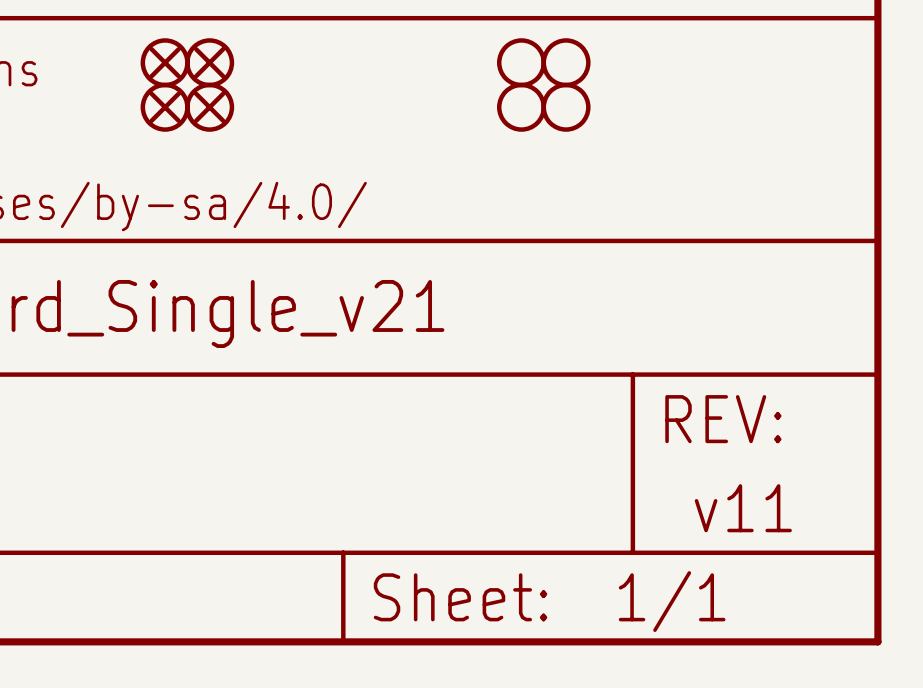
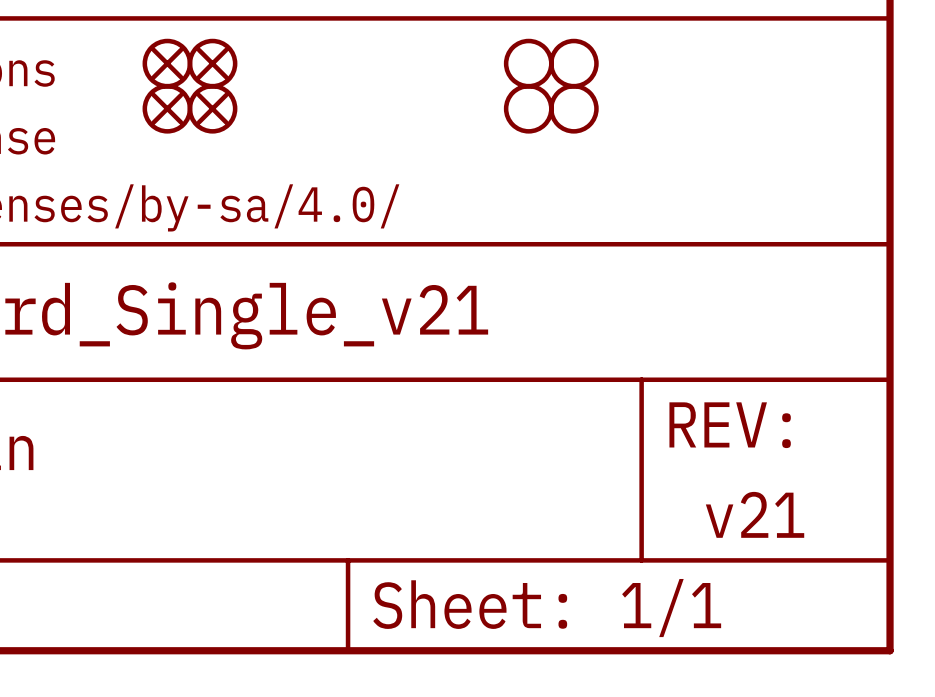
text: v11 (743, 508) -> v21 (755, 514)

